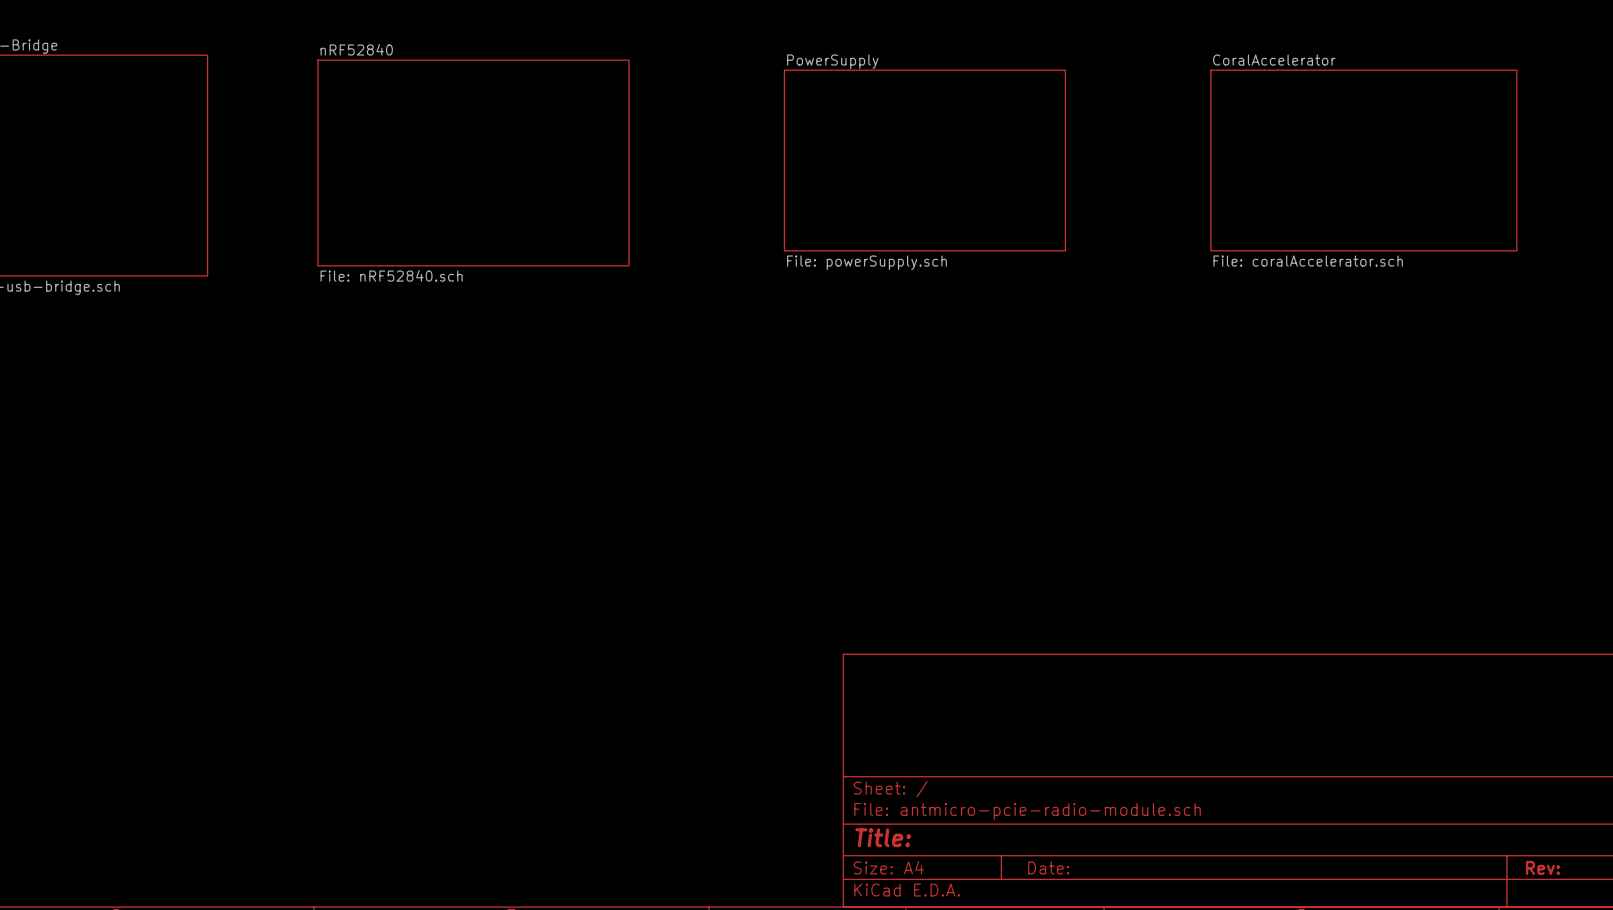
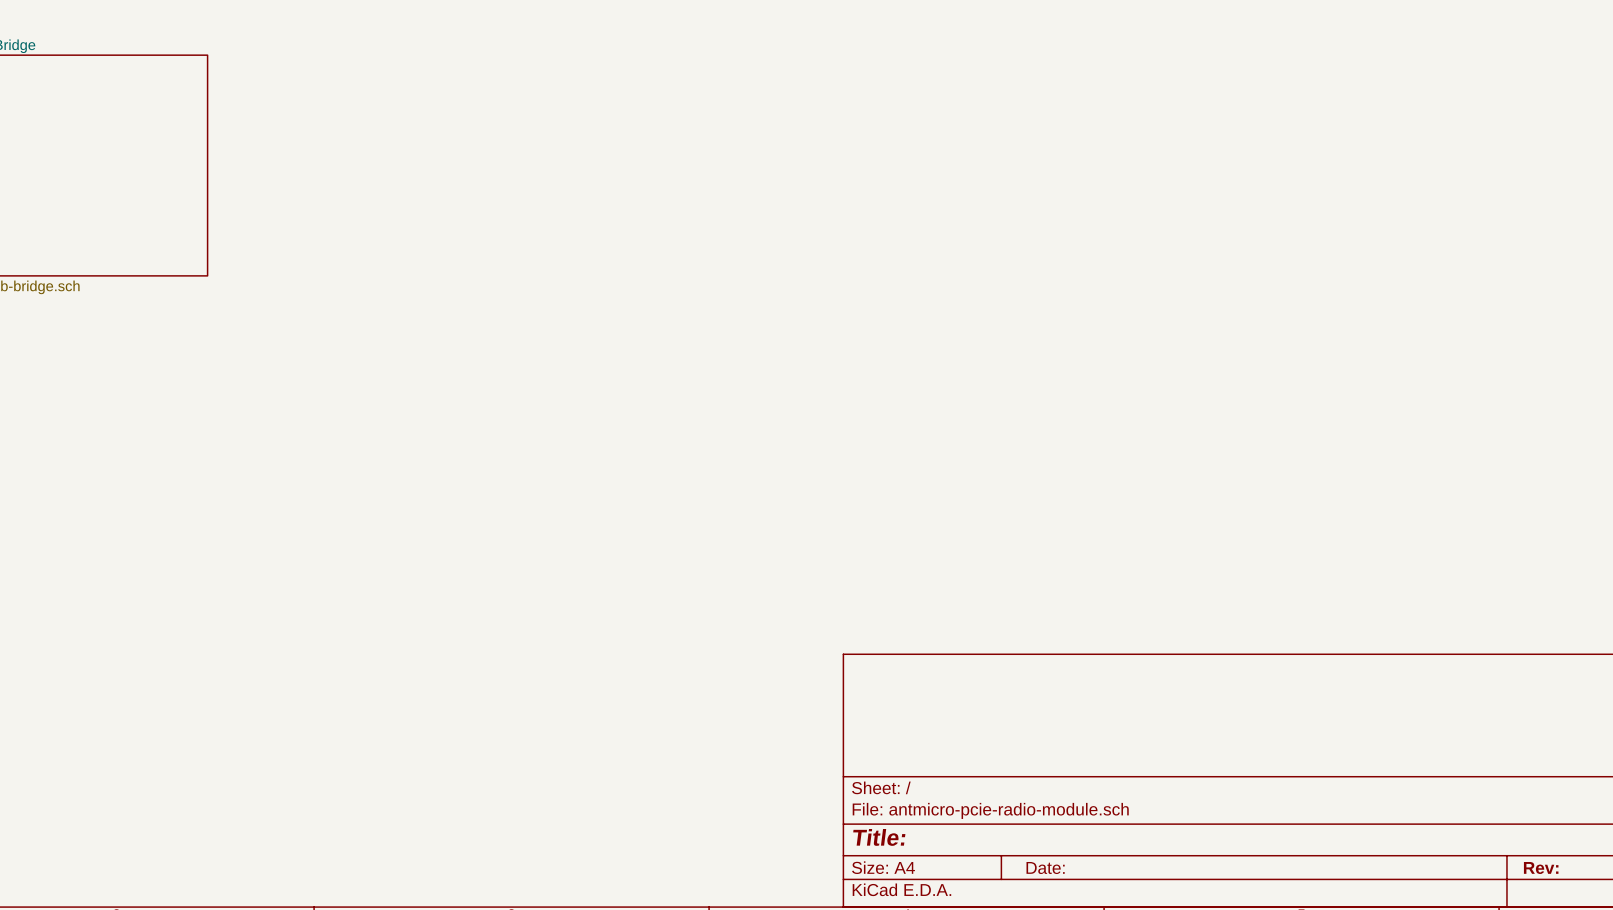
sheet PowerSupply: File: powerSupply.sch (924, 160) -> none
sheet CoralAccelerator: File: coralAccelerator.sch (1363, 160) -> none
sheet nRF52840: File: nRF52840.sch (473, 163) -> none

